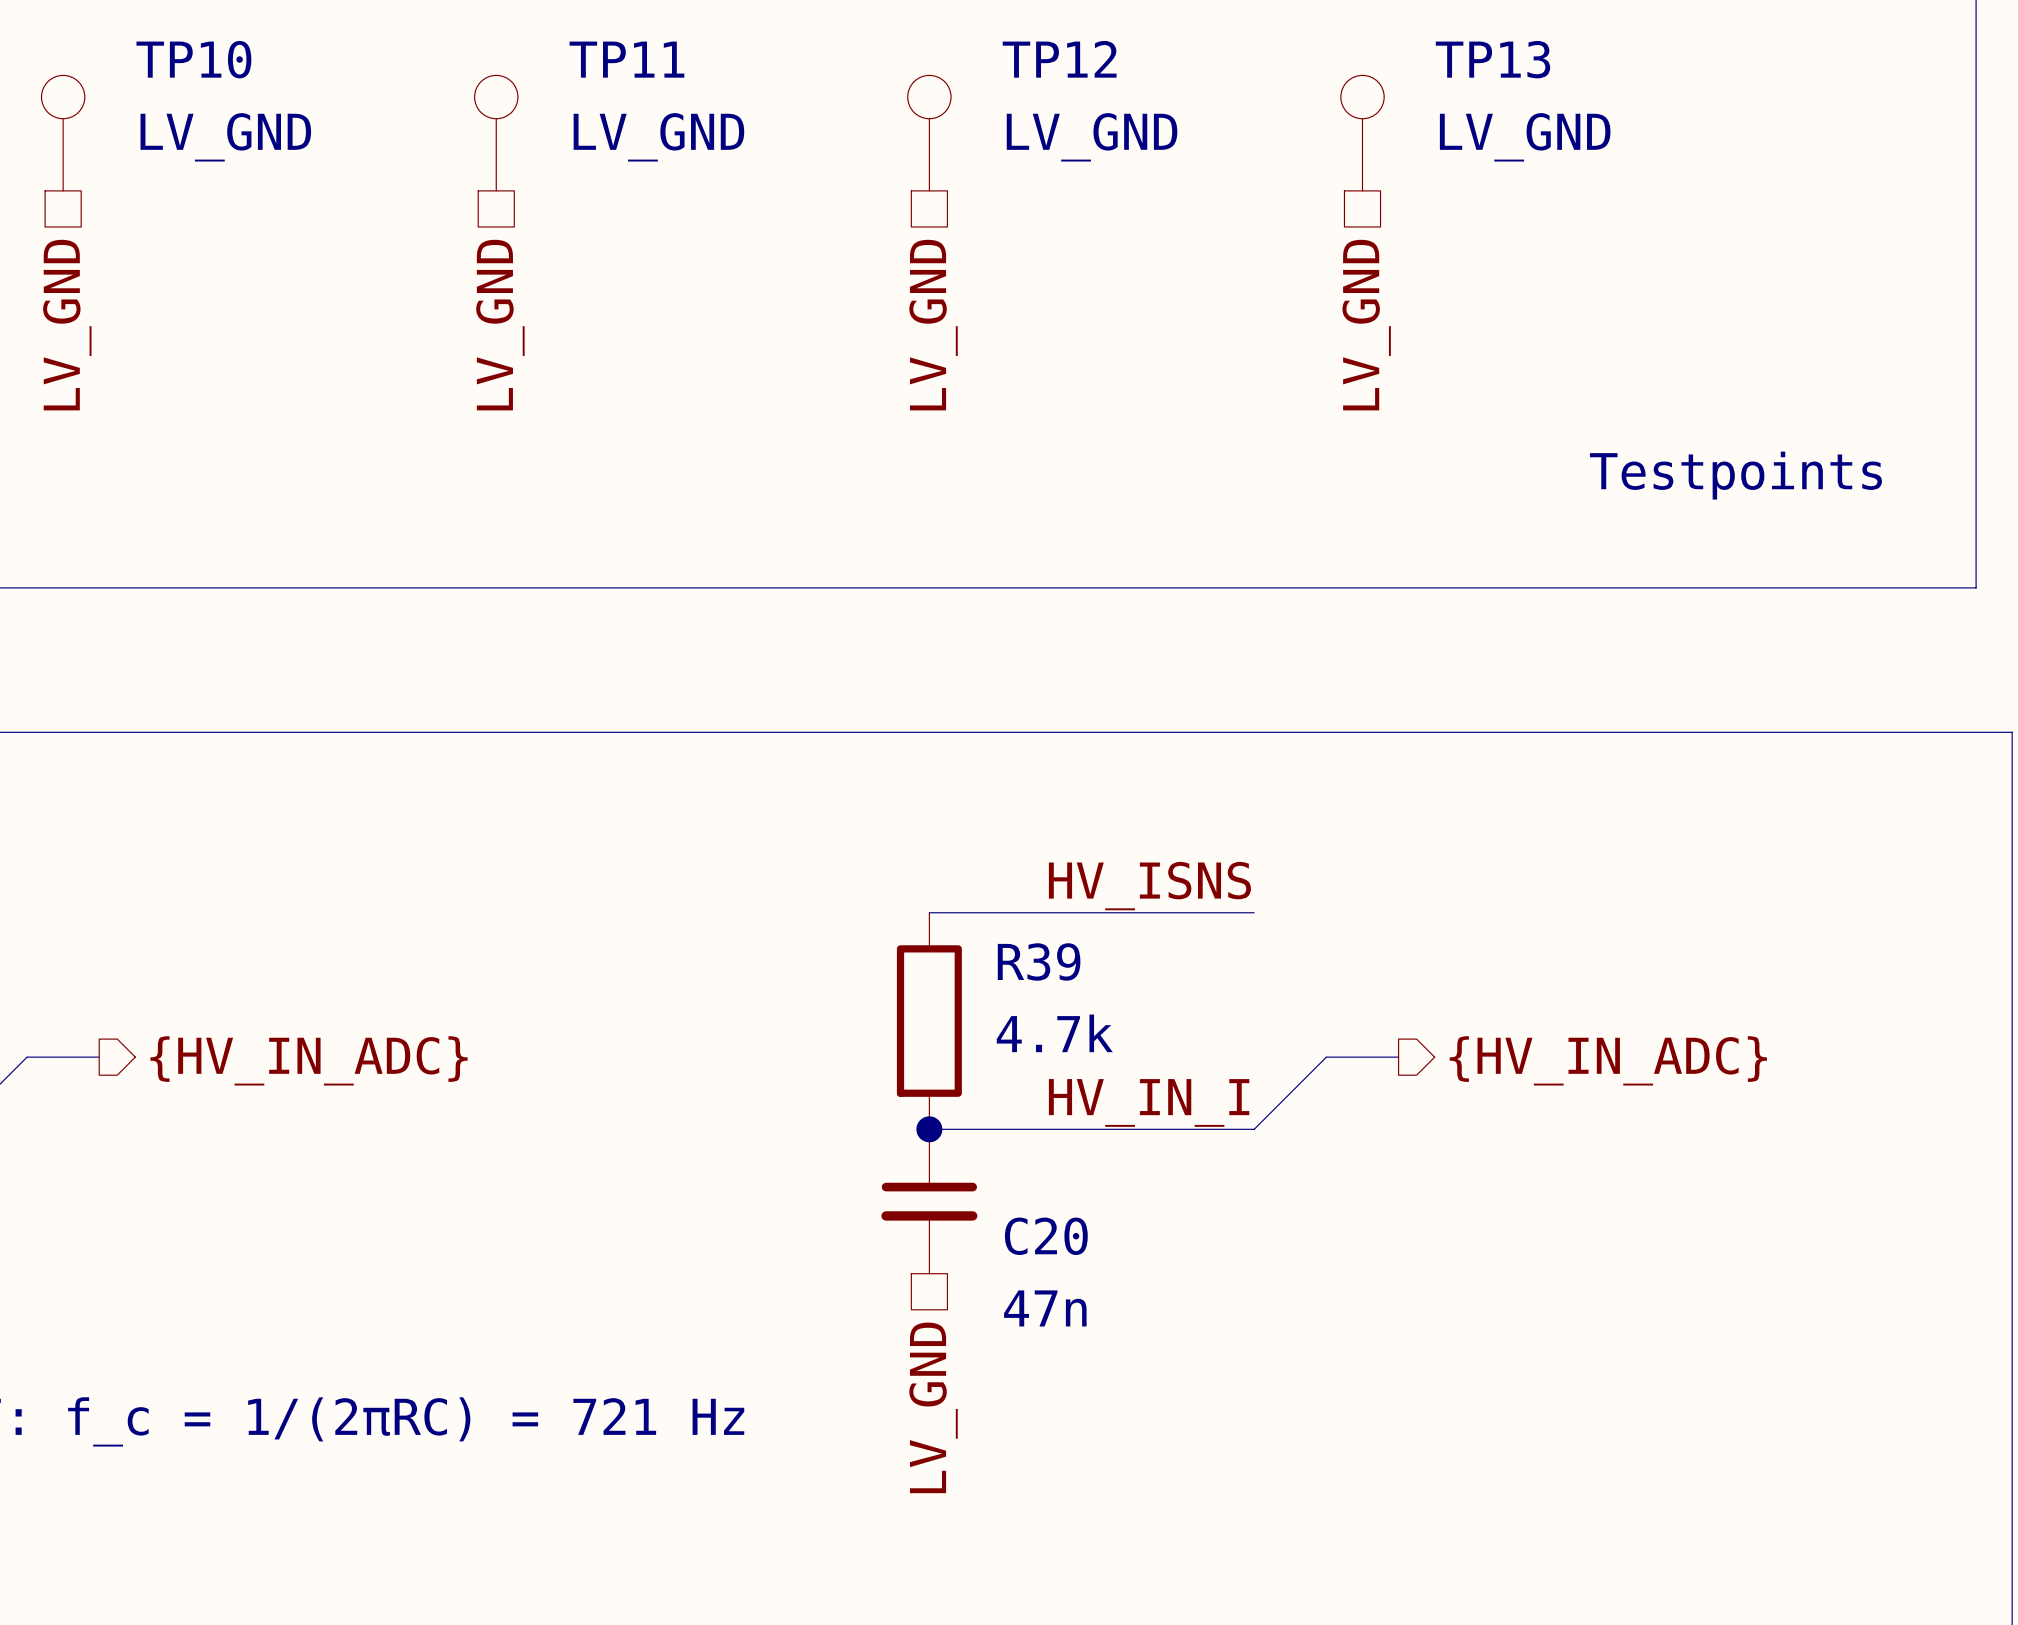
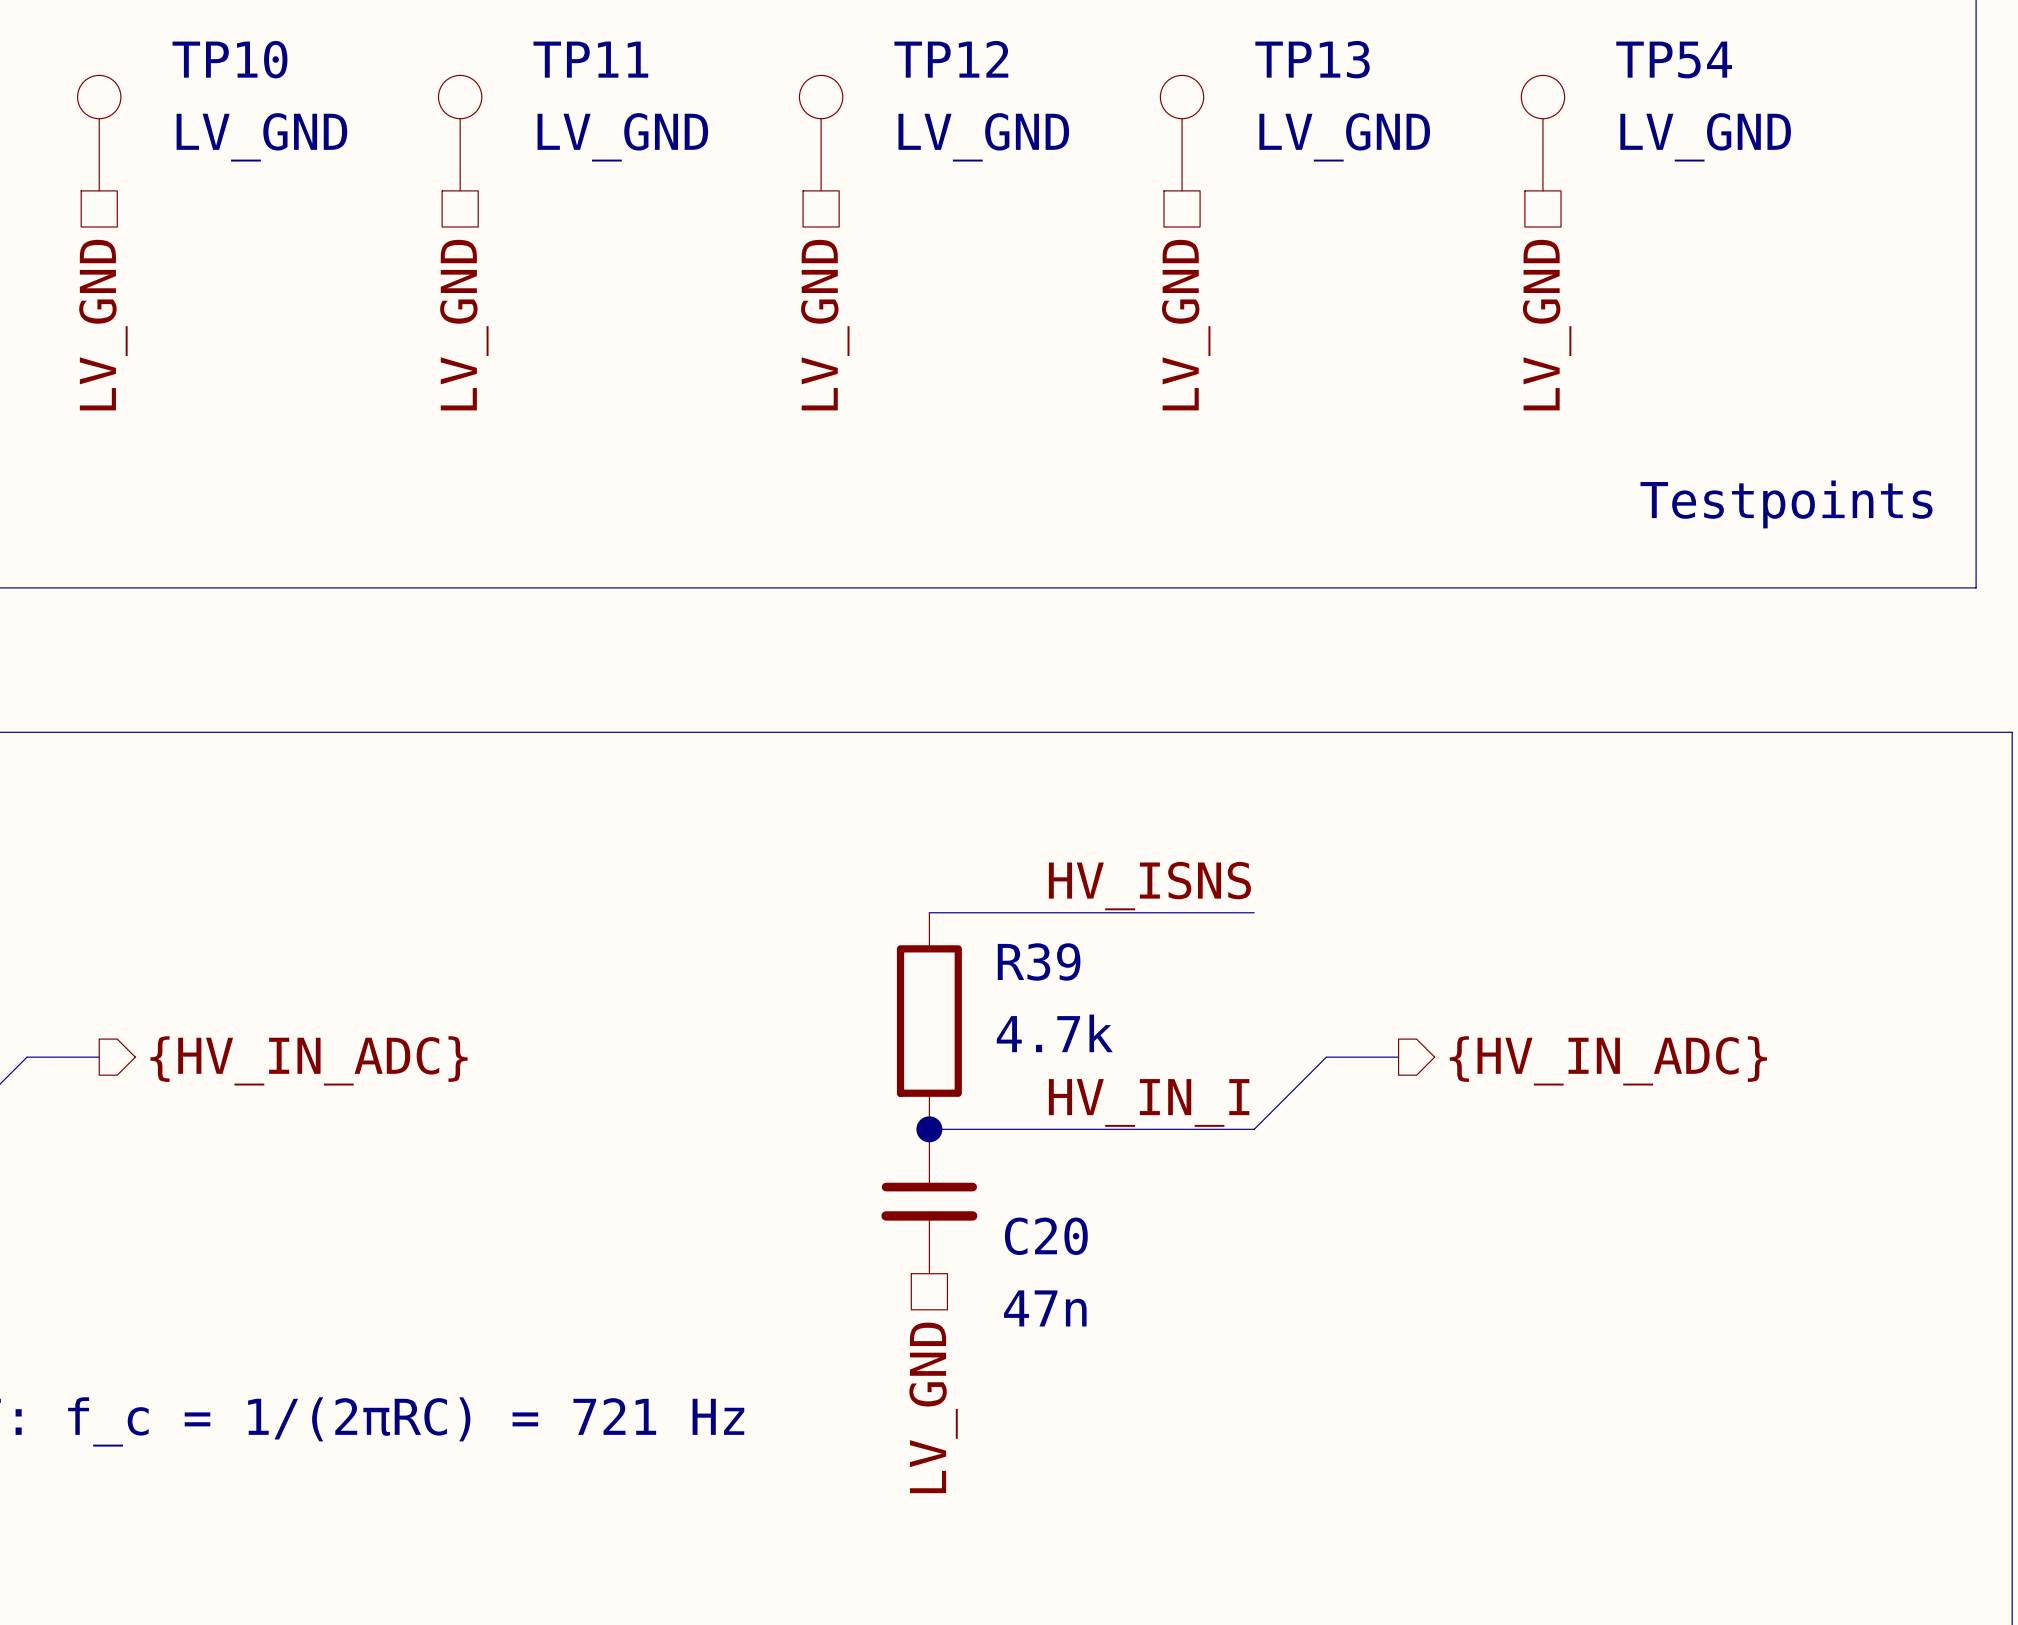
TP10 position: (63, 133) -> (99, 133)
TP11 position: (496, 133) -> (460, 133)
TP12 position: (929, 133) -> (821, 133)
TP13 position: (1362, 133) -> (1182, 133)
TP54: none -> LV_GND (1542, 133)
hierarchical label position: LV_GND (67, 325) -> LV_GND (103, 325)
hierarchical label position: LV_GND (500, 325) -> LV_GND (464, 325)
hierarchical label position: LV_GND (933, 325) -> LV_GND (825, 325)
hierarchical label: none -> LV_GND (1186, 325)
hierarchical label: LV_GND (1366, 325) -> none
hierarchical label: none -> LV_GND (1547, 325)
text position: Testpoints (1735, 475) -> Testpoints (1786, 504)

